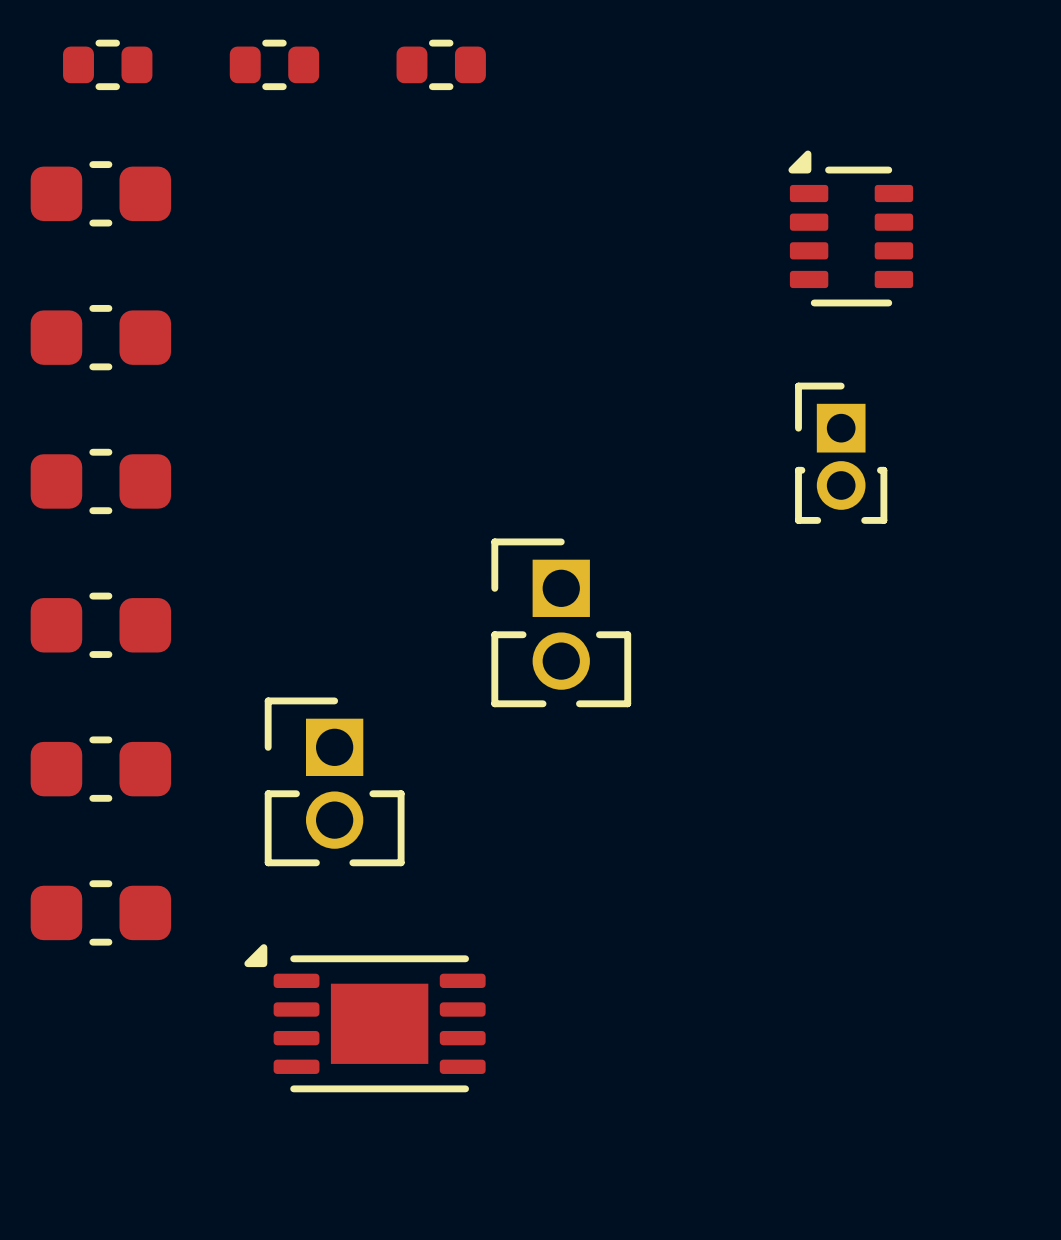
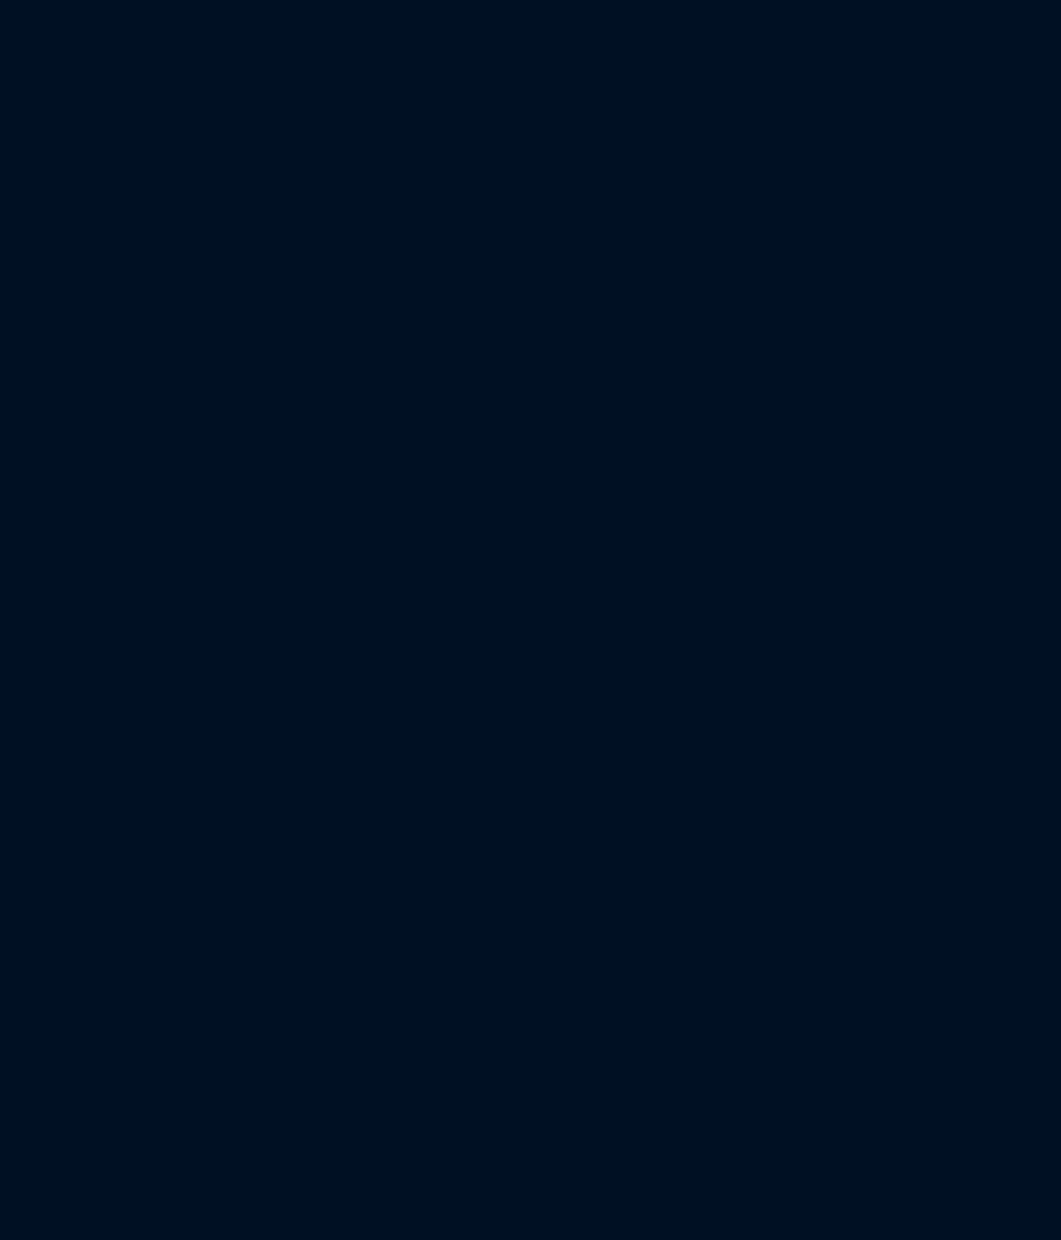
part: (107, 64) -> none
part: (274, 64) -> none
part: (441, 64) -> none
part: (100, 193) -> none
part: (850, 228) -> none
part: (100, 337) -> none
part: (841, 453) -> none
part: (100, 481) -> none
part: (561, 622) -> none
part: (100, 625) -> none
part: (100, 769) -> none
part: (334, 781) -> none
part: (100, 912) -> none
part: (365, 1018) -> none

